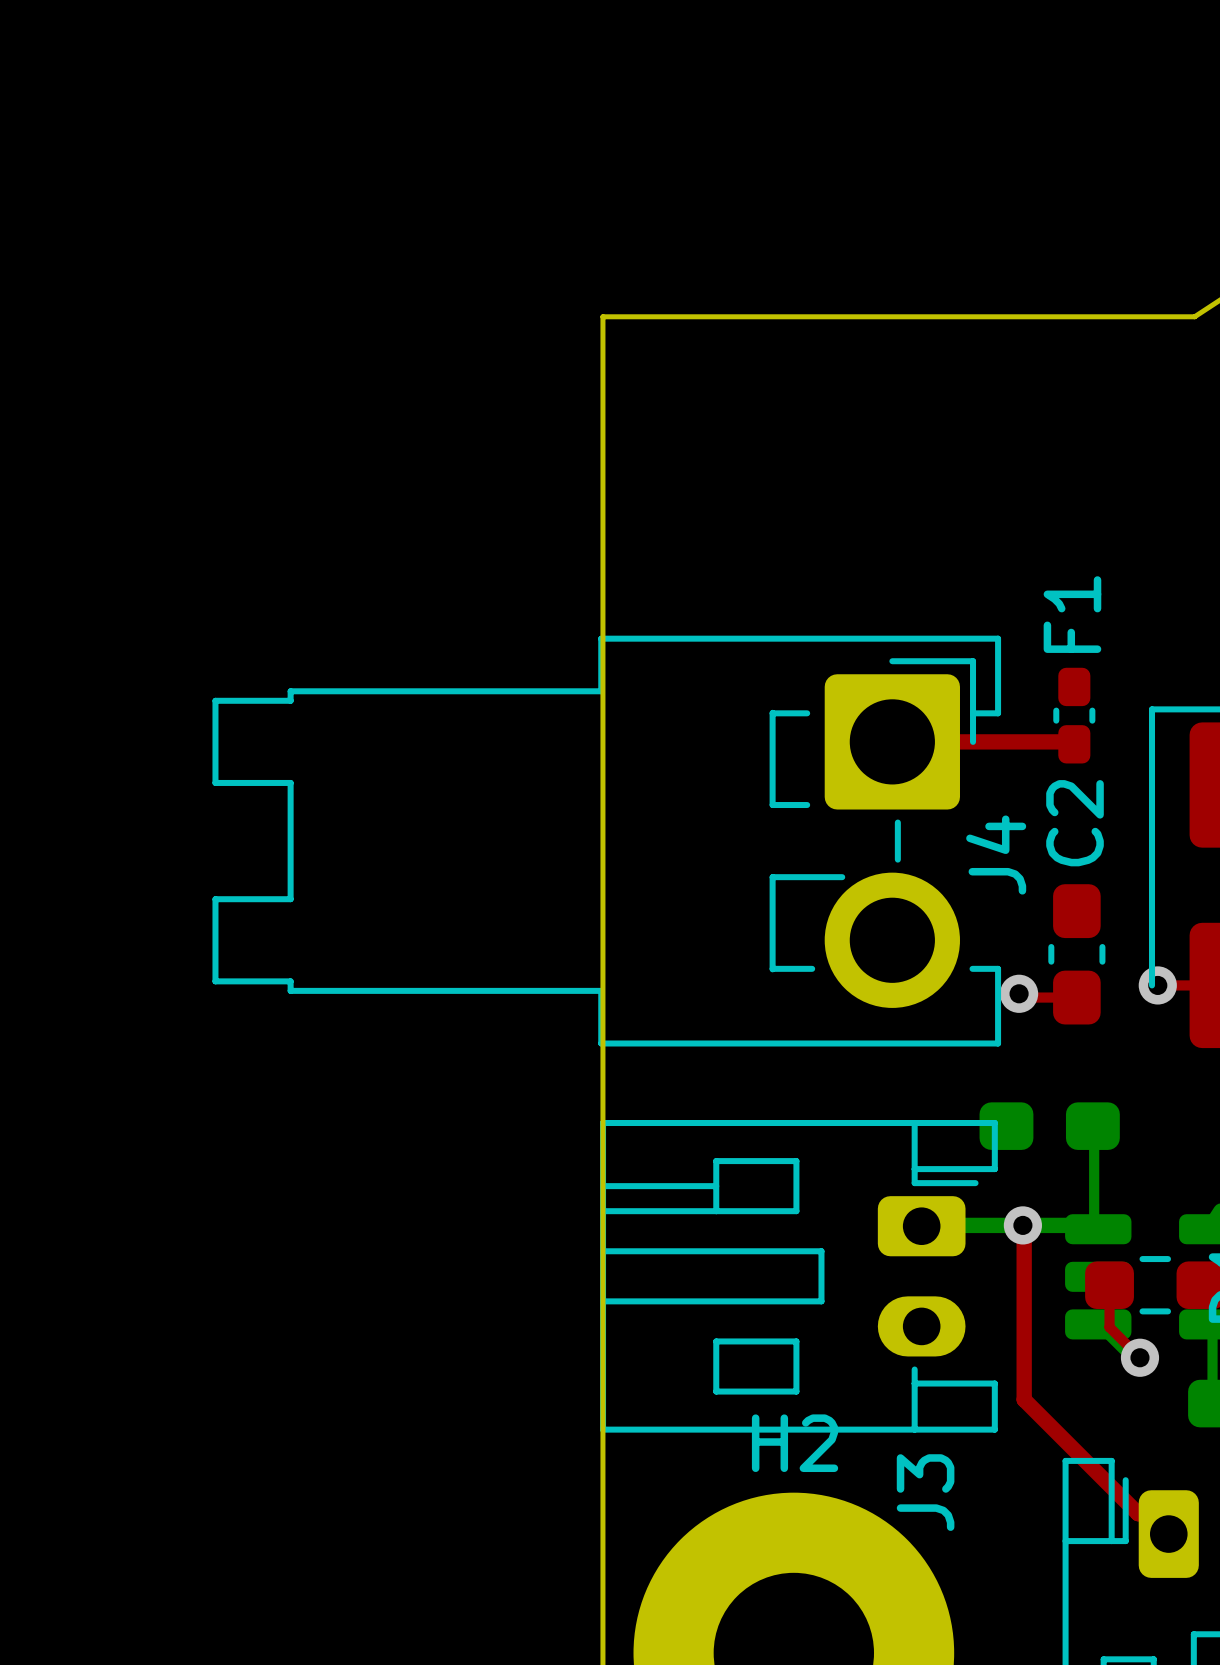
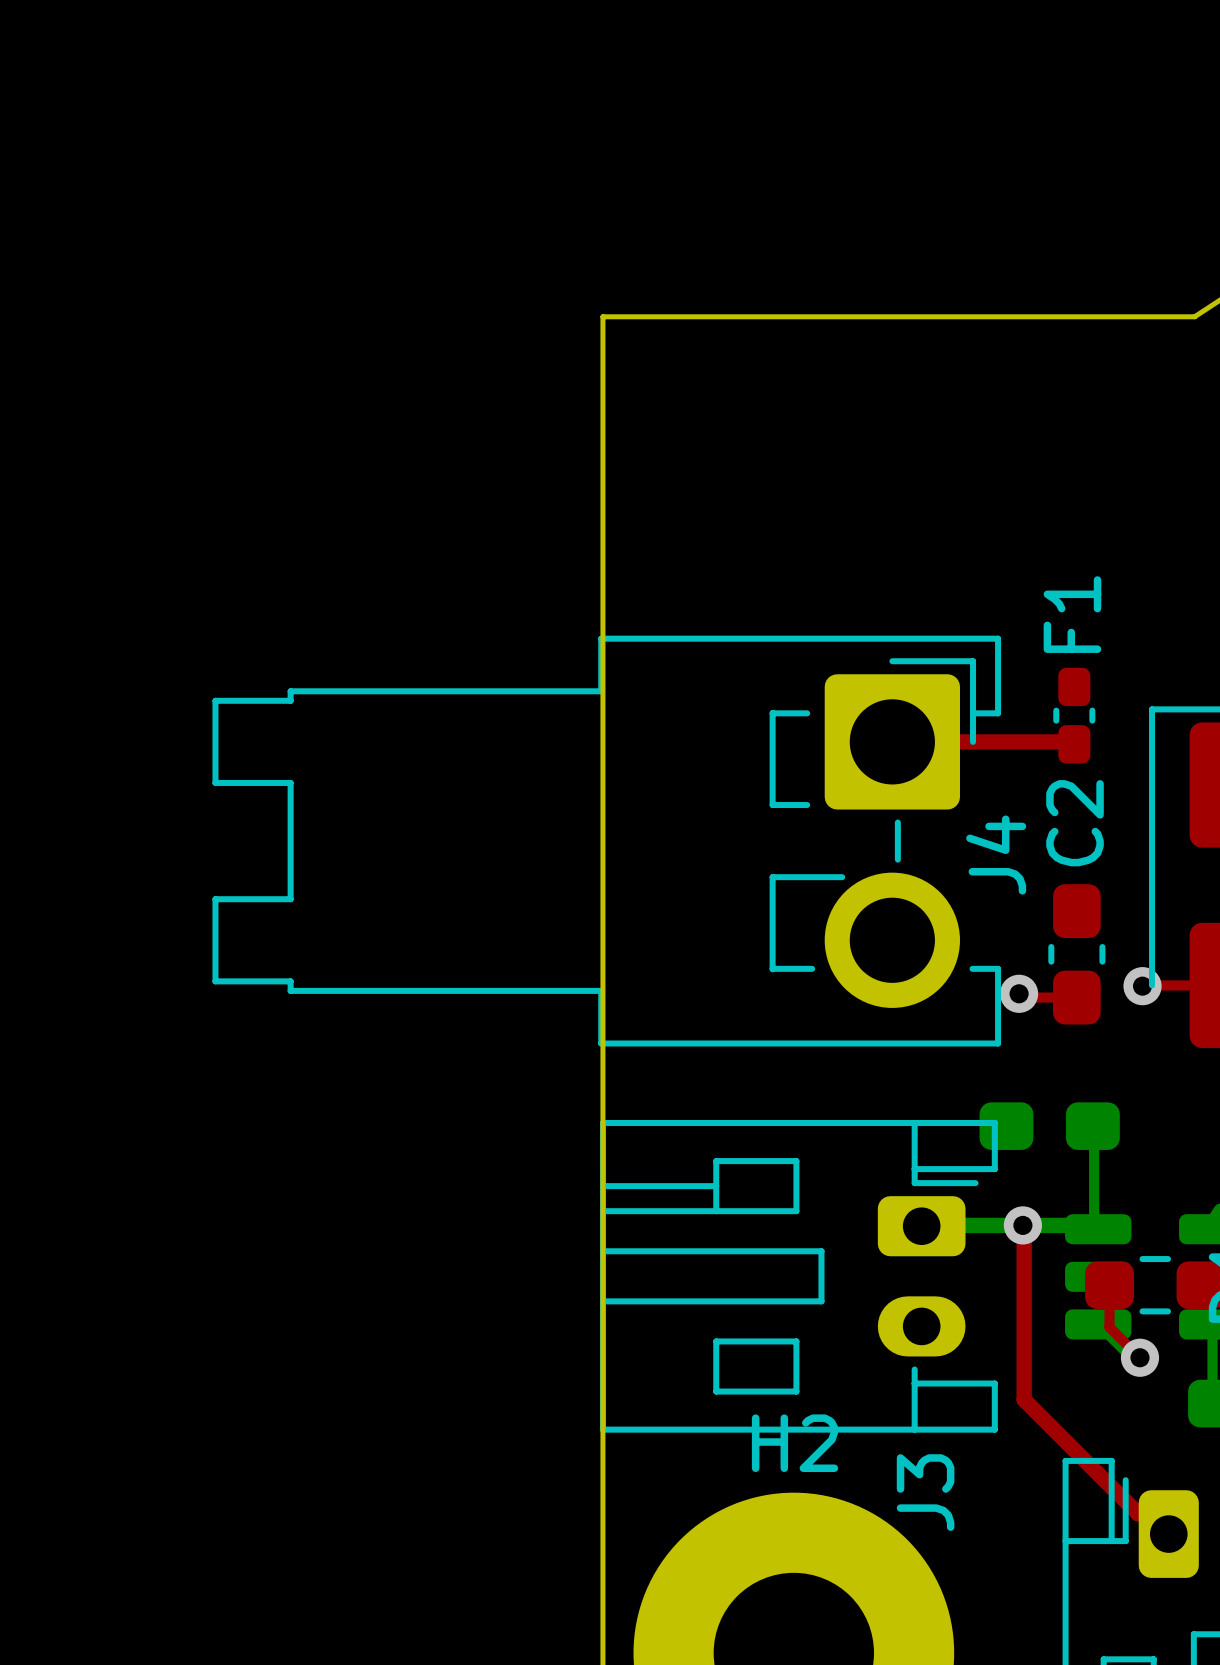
via position: (1157, 985) -> (1142, 986)

